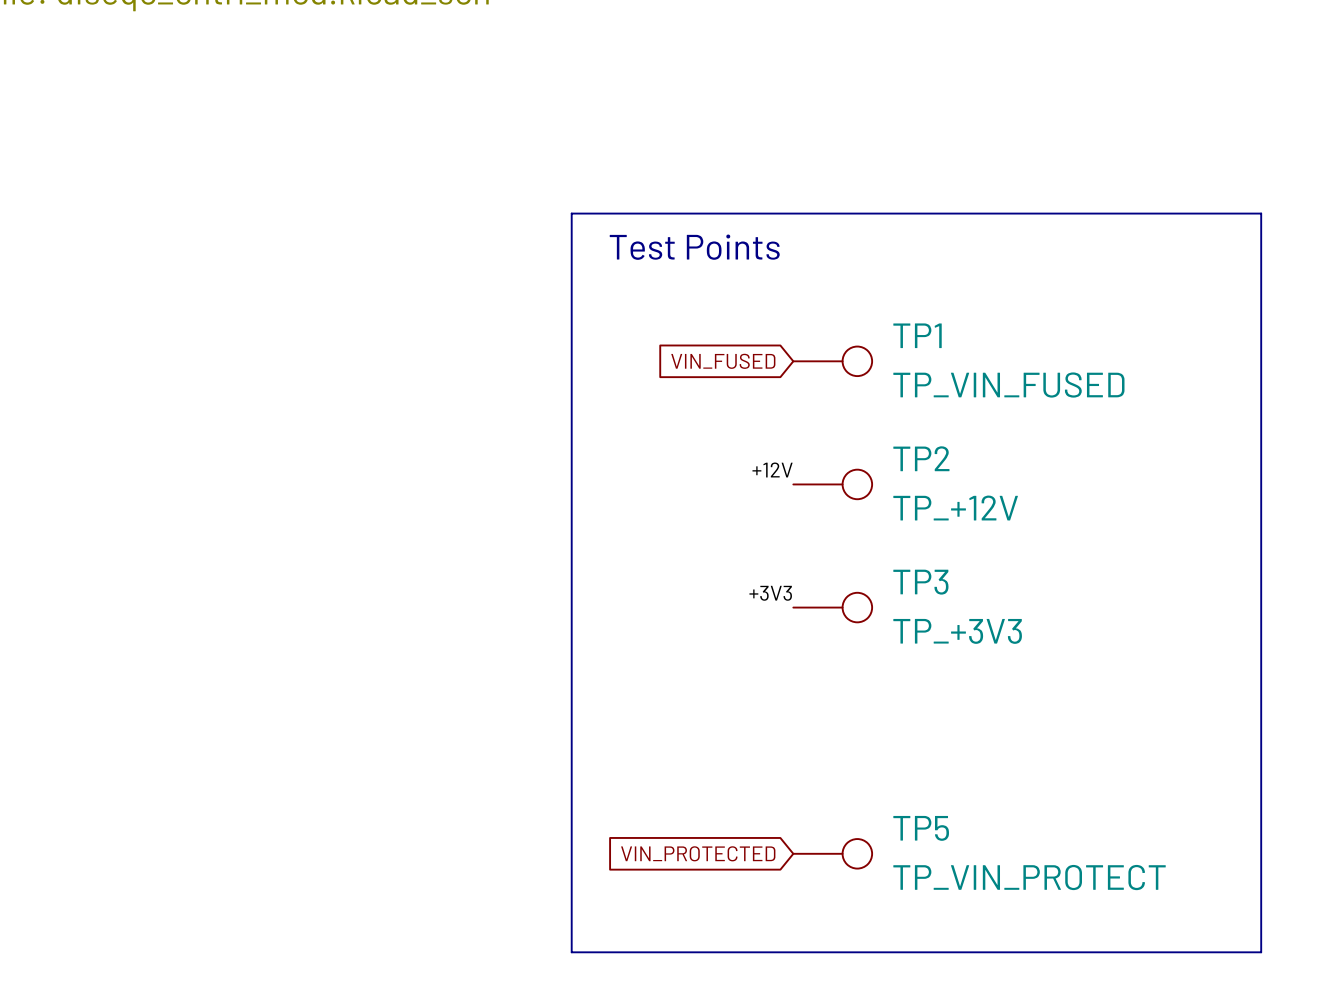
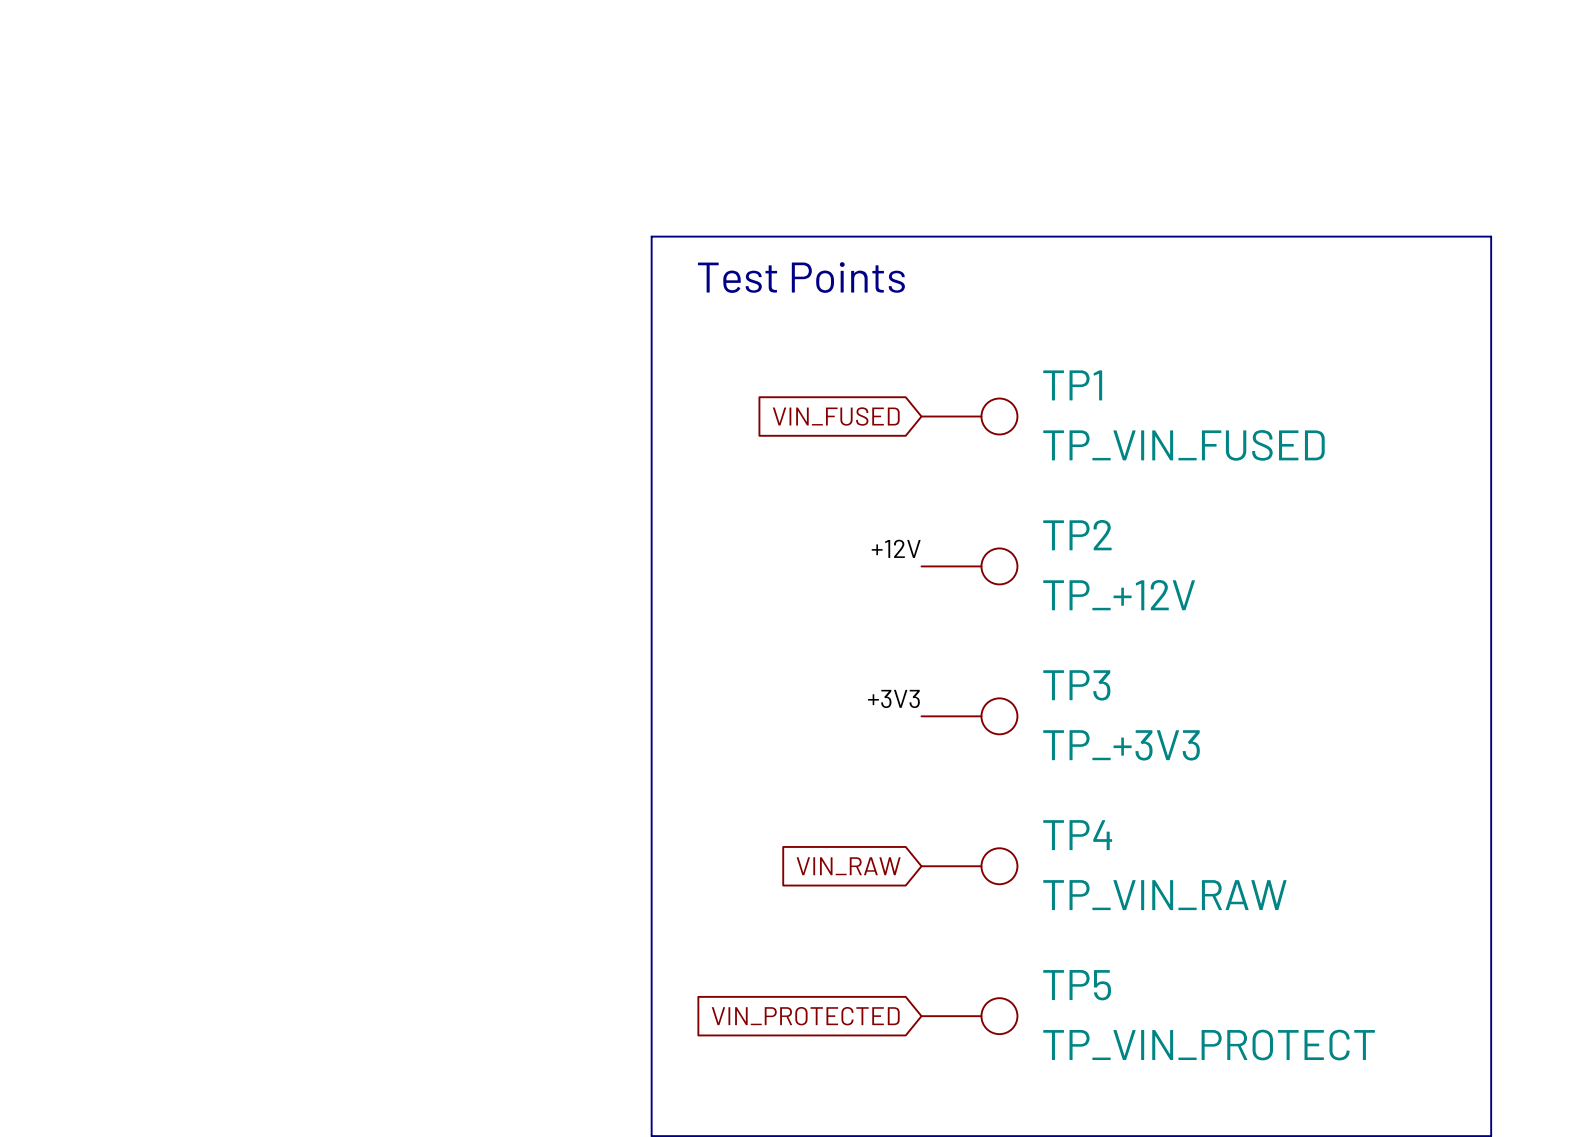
global label: none -> VIN_RAW (848, 866)
TP4: none -> TP_VIN_RAW (969, 866)

